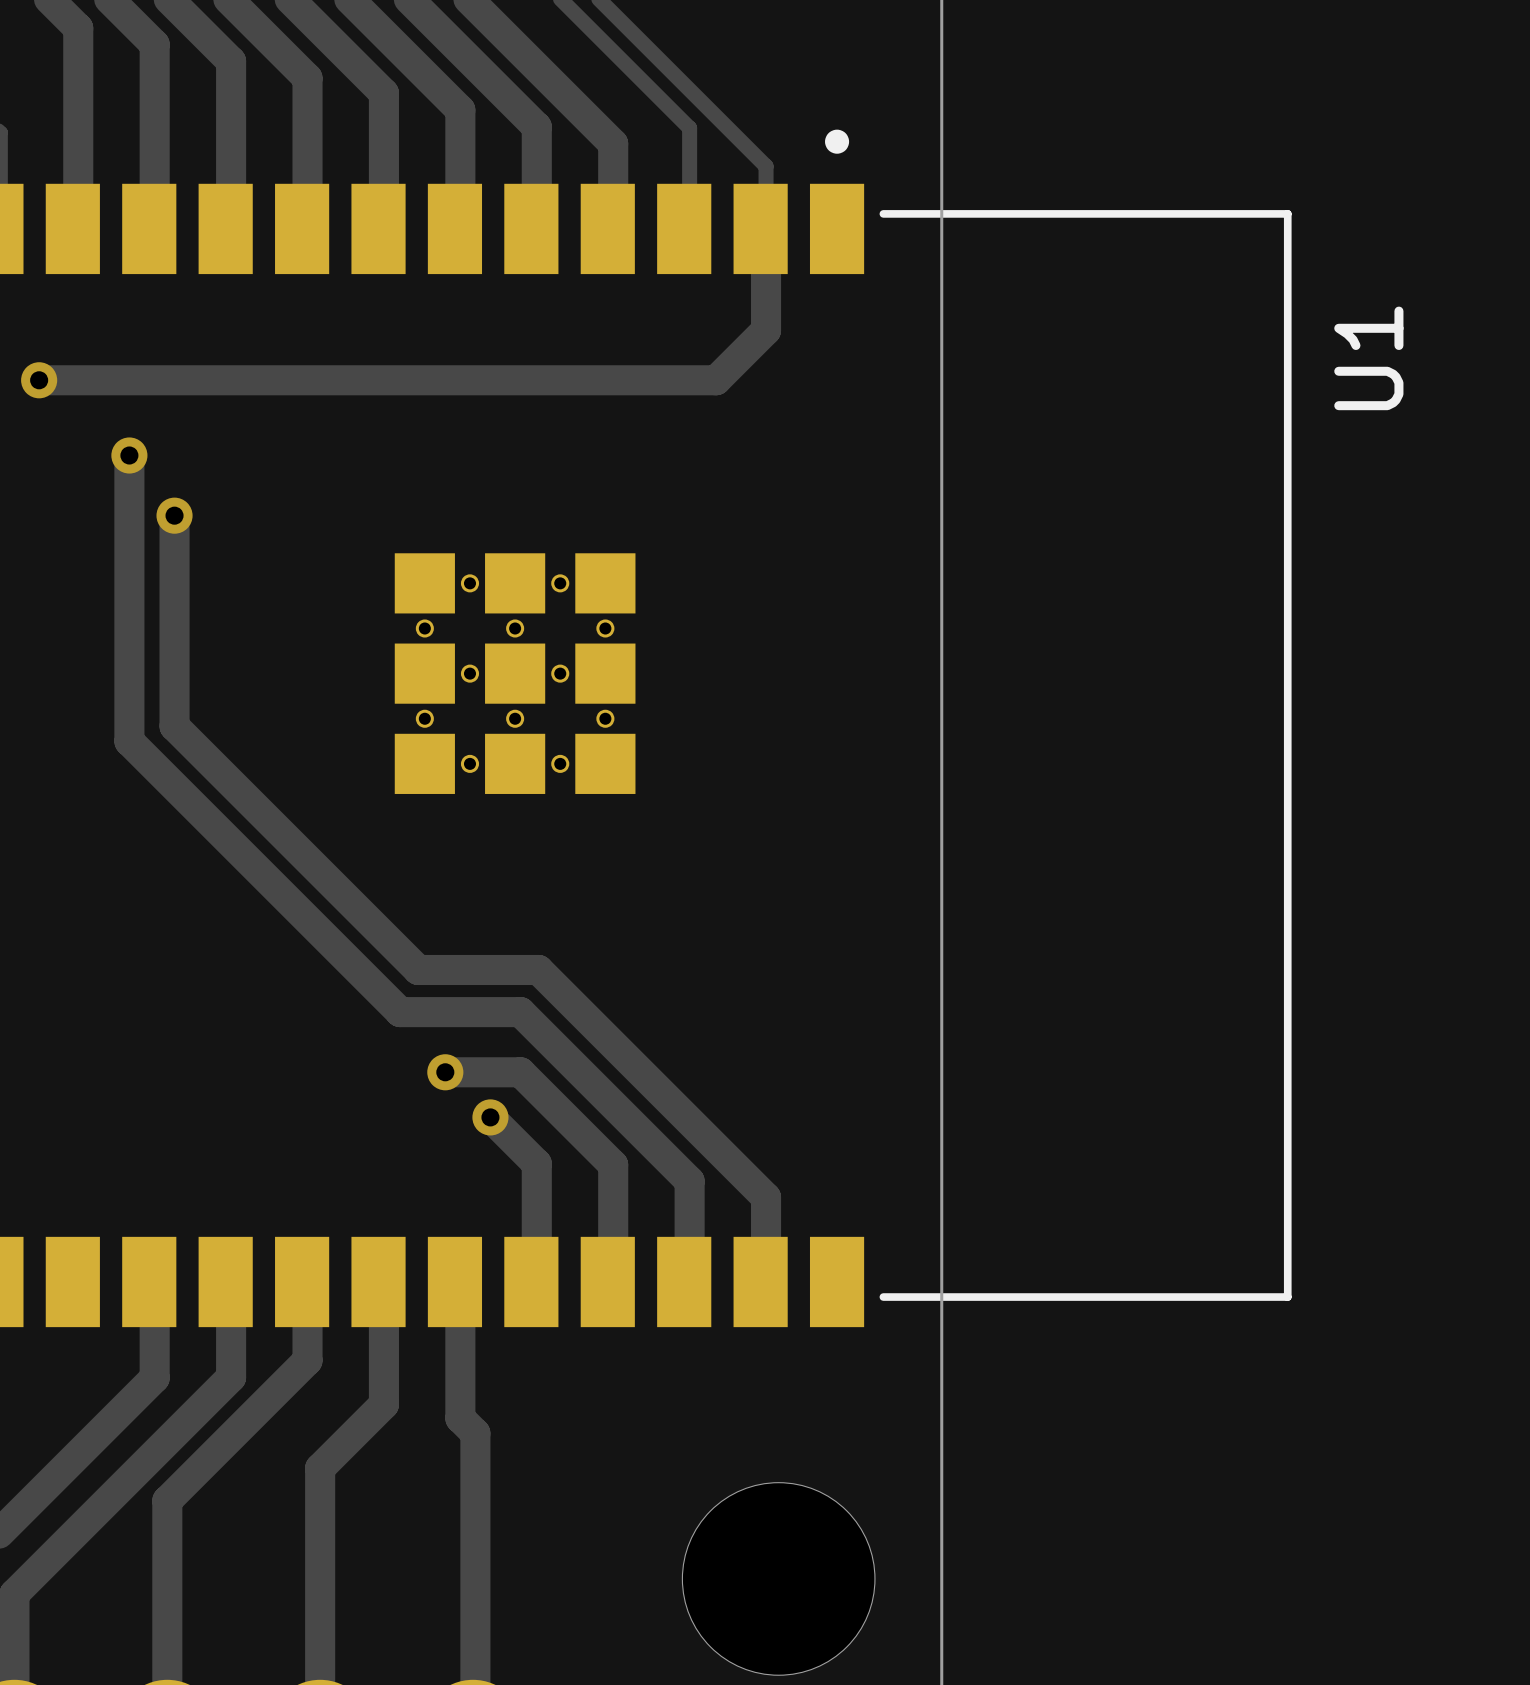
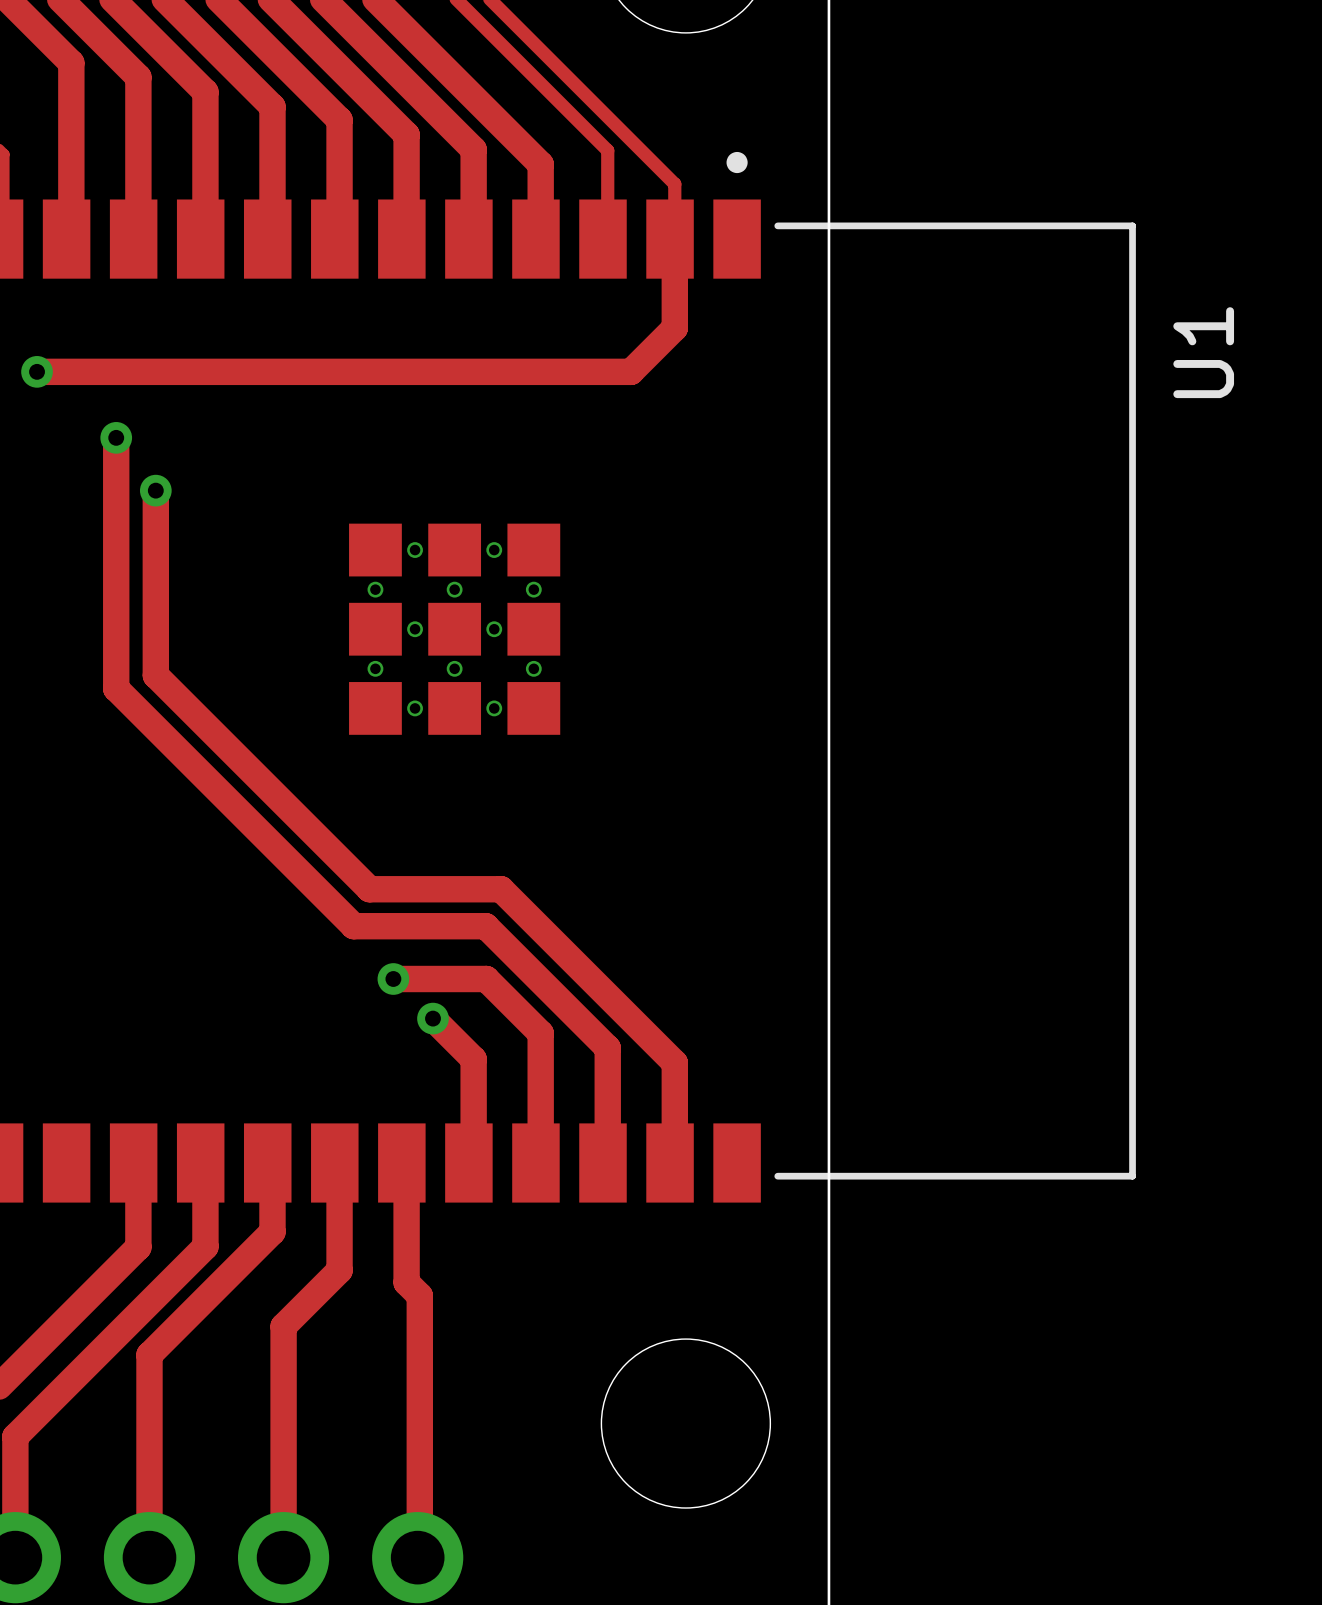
track: (538, 969) (766, 1197) -> (475, 889) (501, 889) (674, 1062) (674, 1088)
track: (520, 1012) (689, 1181) -> (459, 926) (485, 926) (607, 1048) (607, 1074)
track: (520, 1072) (613, 1164) -> (459, 979) (486, 979) (540, 1033) (540, 1060)

